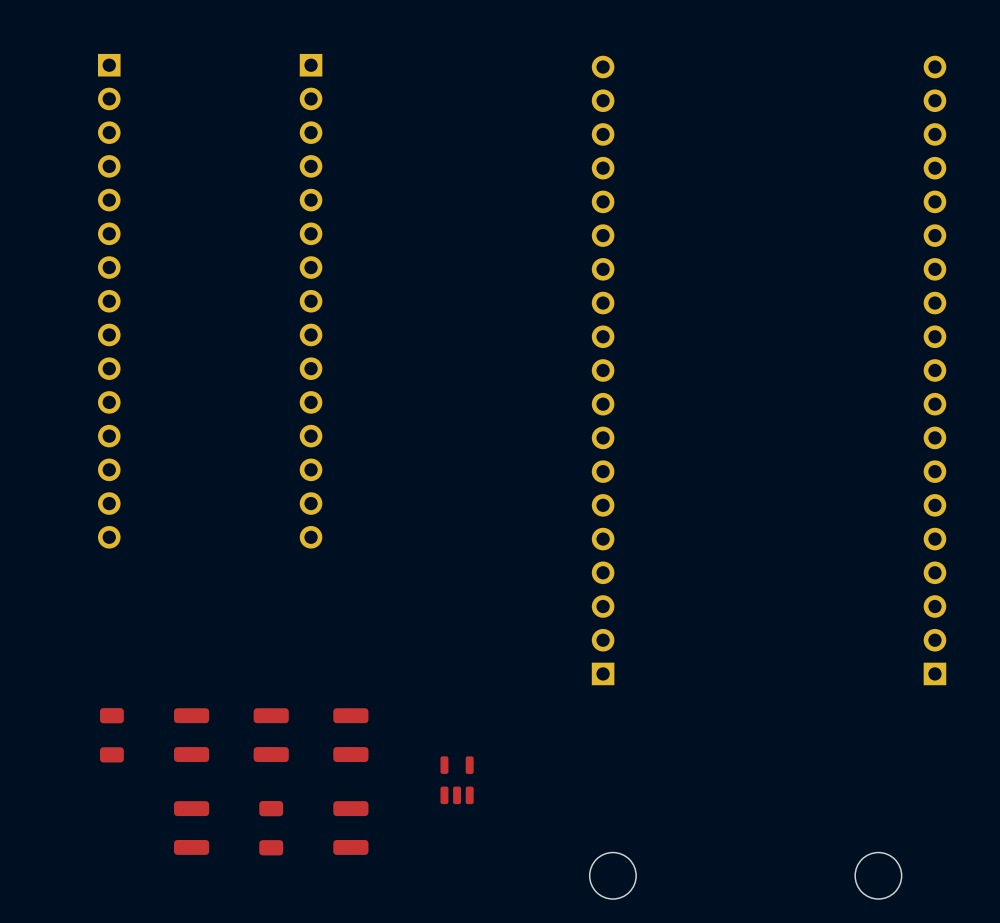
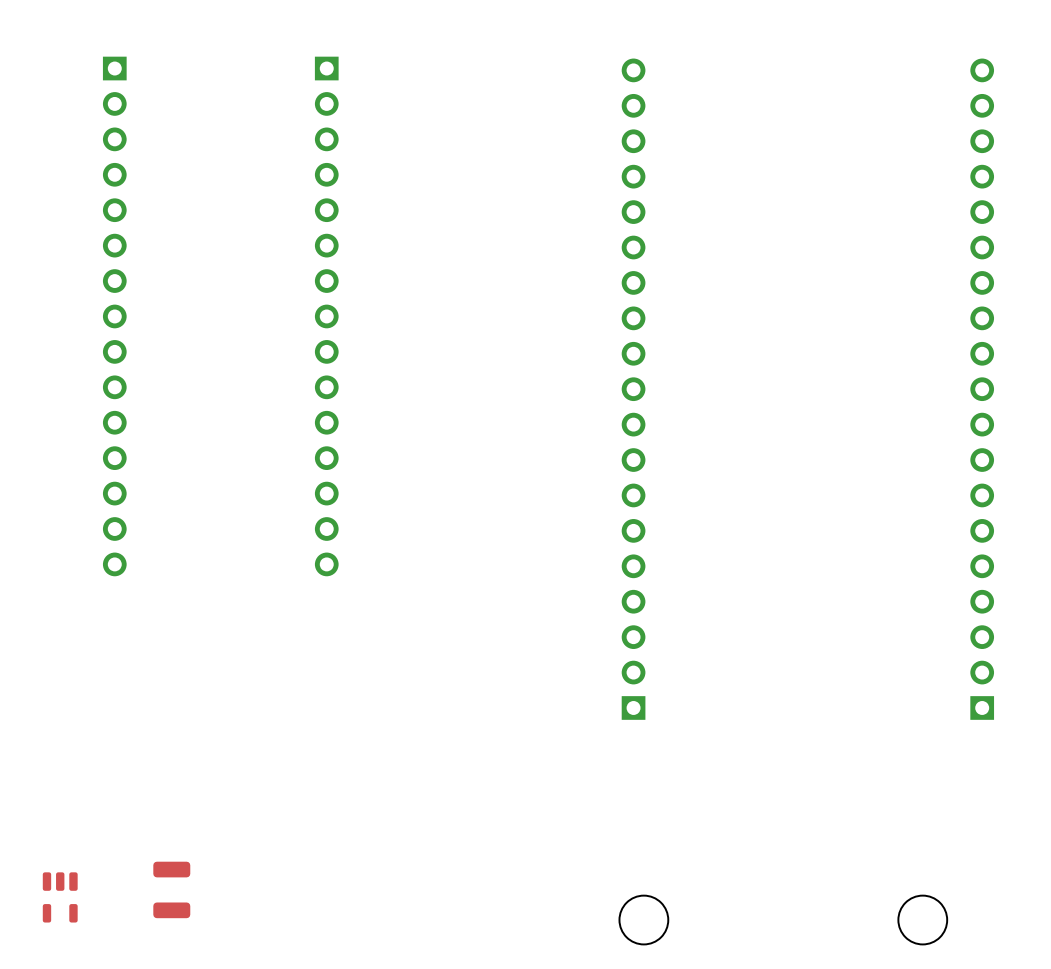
part: (111, 735) -> none
part: (191, 735) -> none
part: (271, 735) -> none
part: (350, 735) -> none
part: (457, 780) -> none
part position: (191, 828) -> (171, 889)
part: (271, 828) -> none
part: (350, 828) -> none
part: none -> (60, 897)

